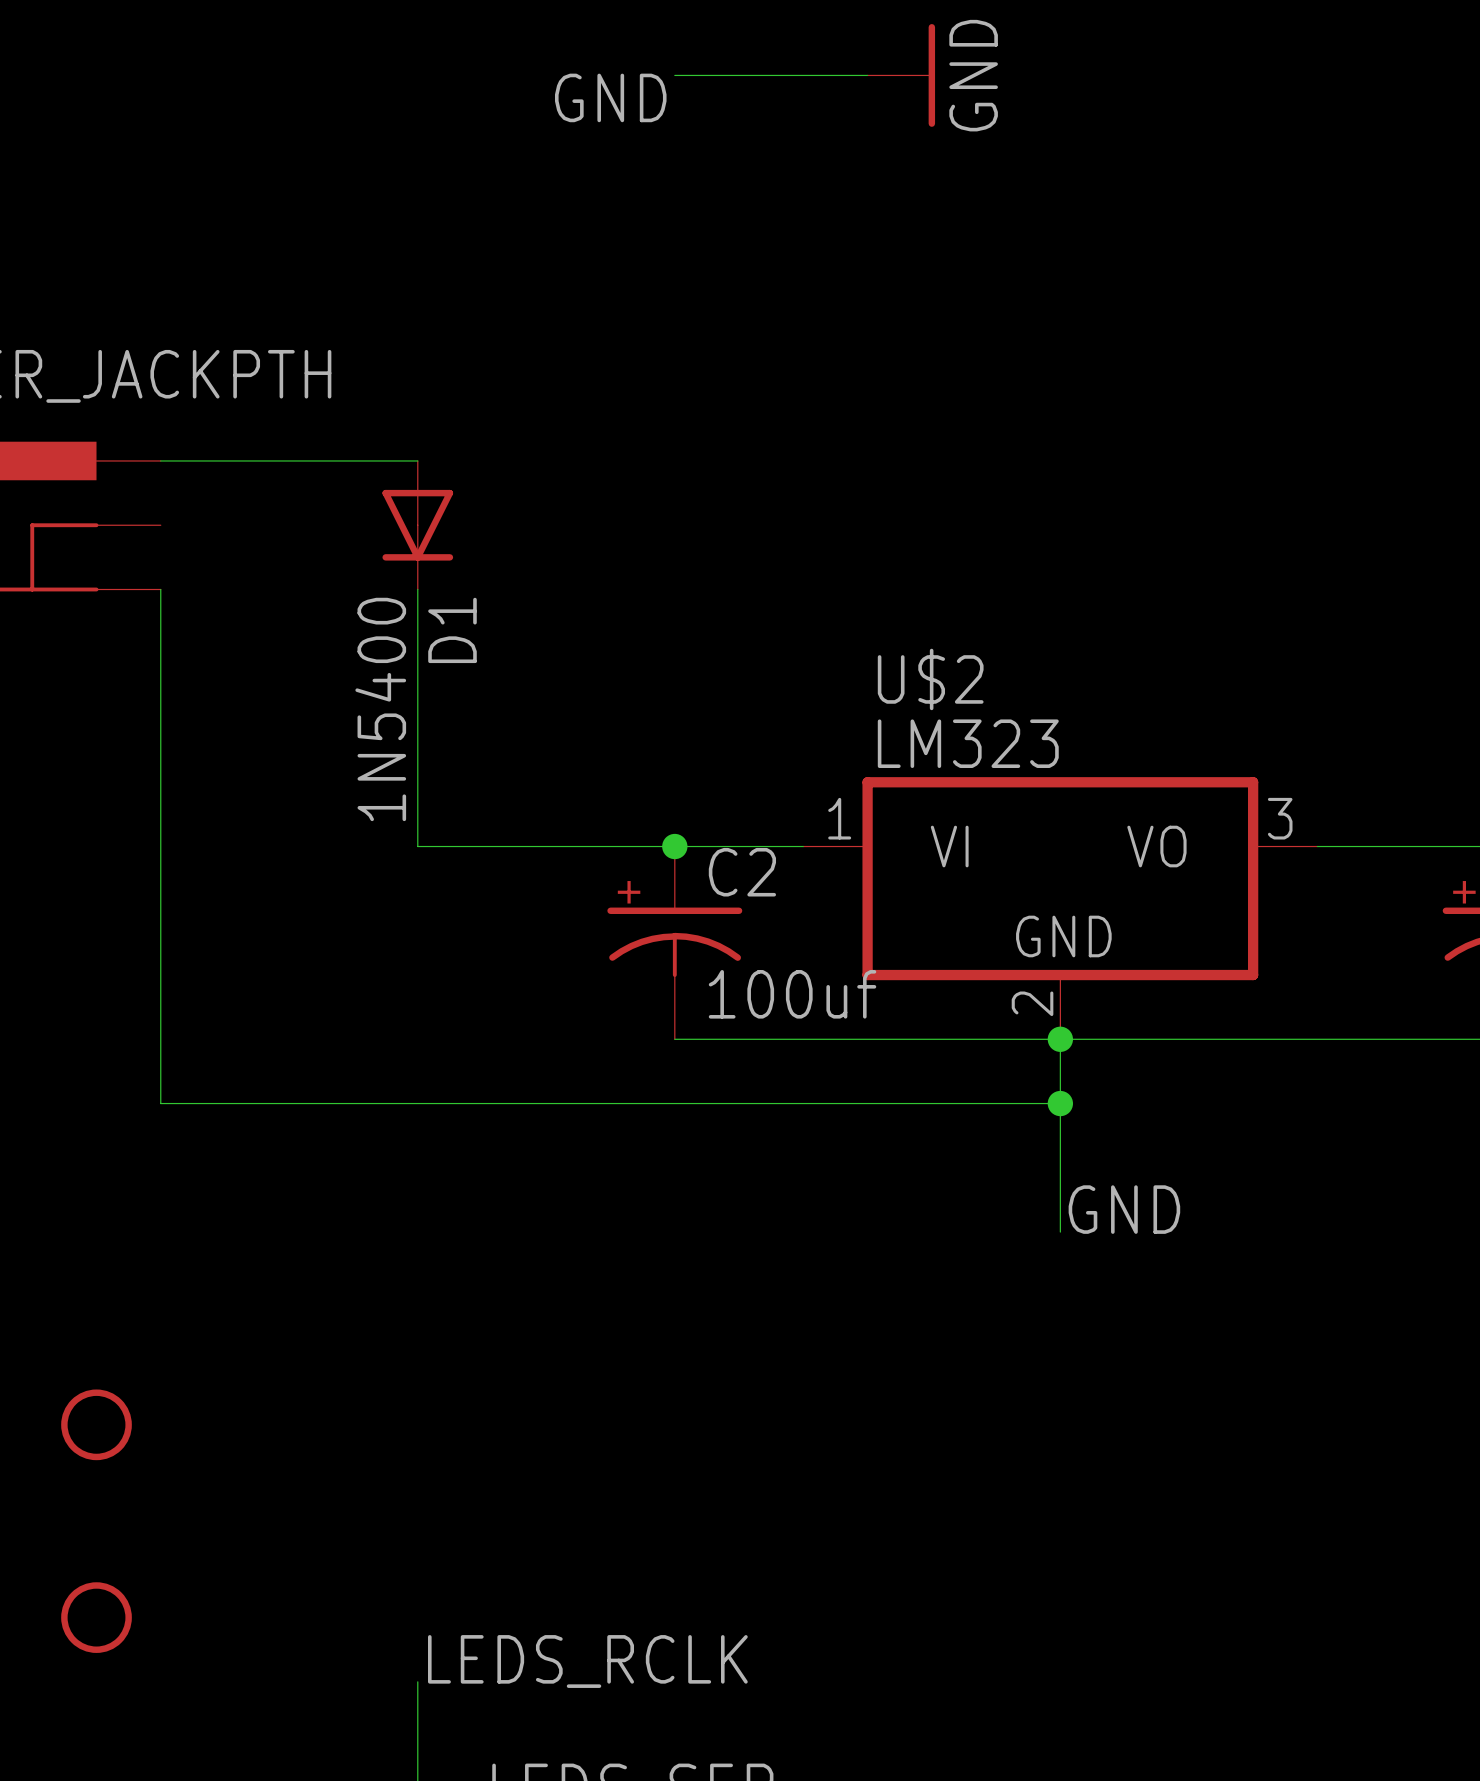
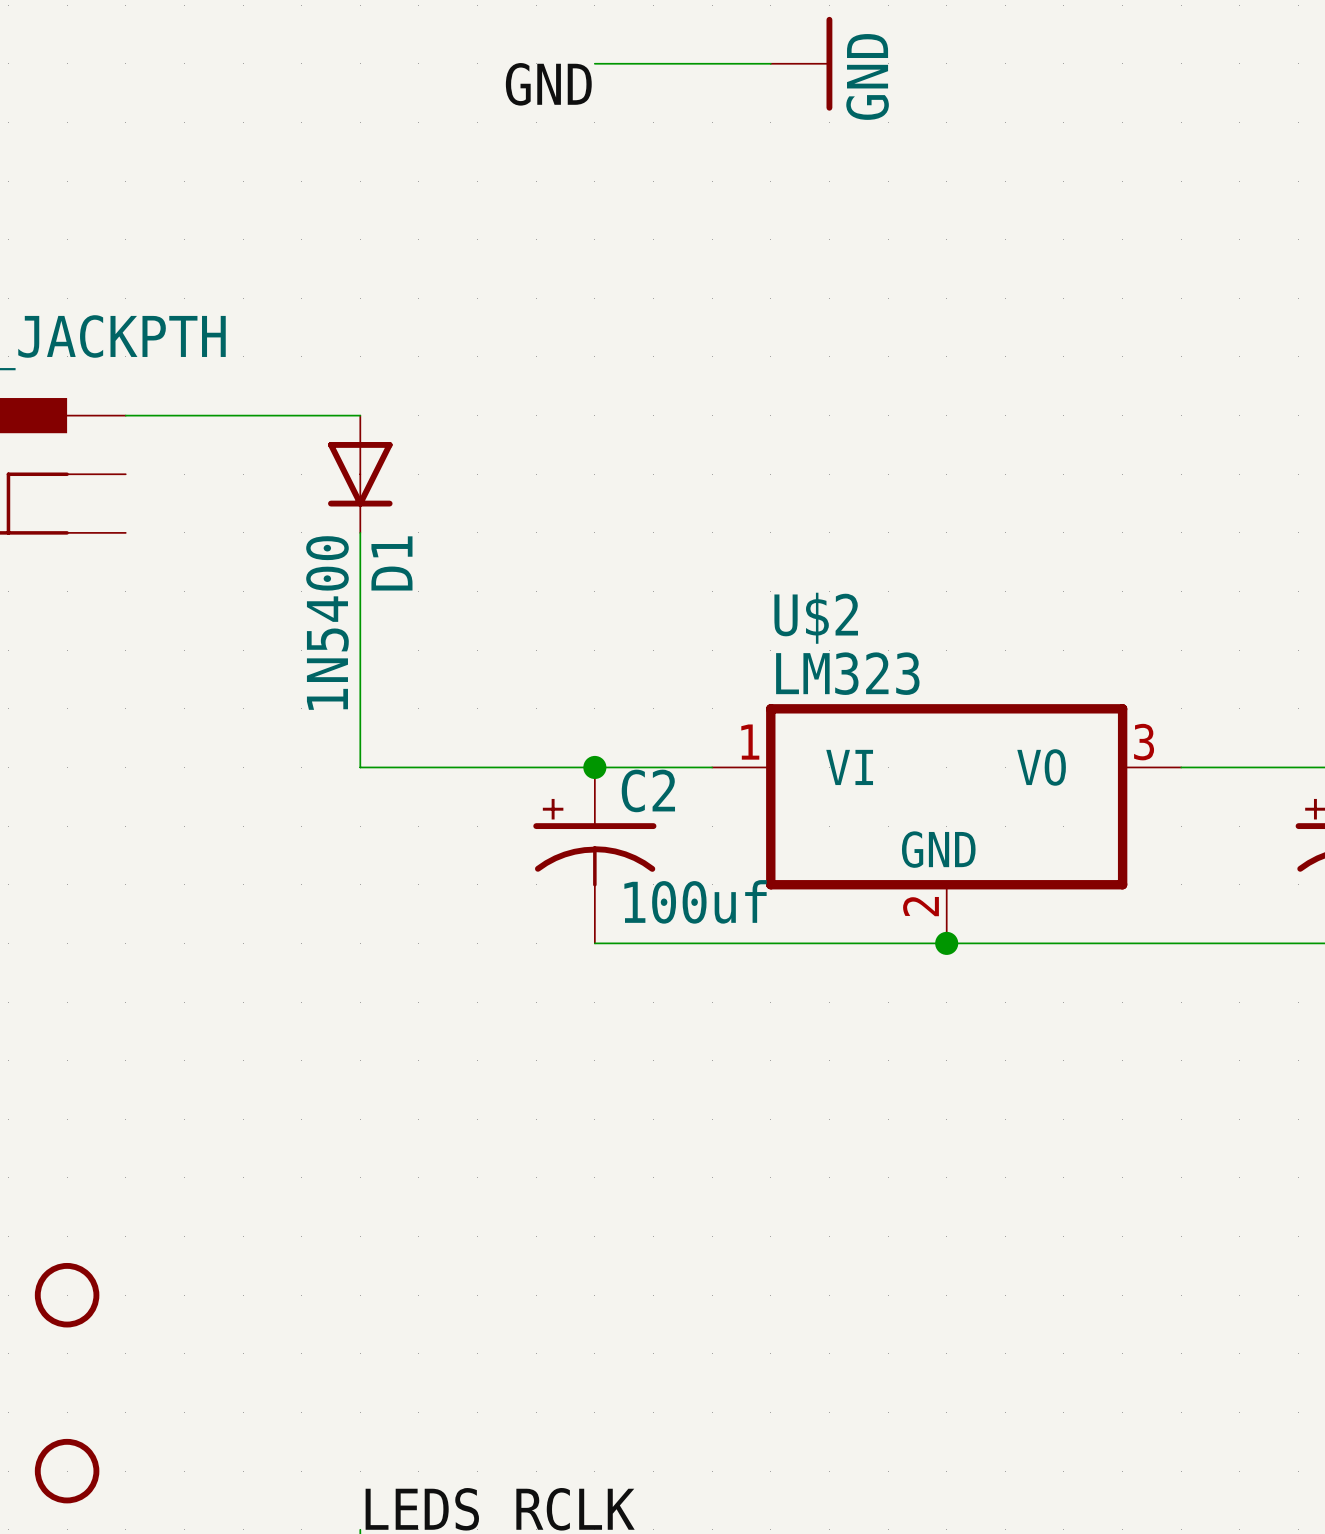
wire: (160, 589) (160, 1103) (1060, 1103) -> none
wire: (1060, 1039) (1060, 1232) -> none
junction: (1060, 1103) -> none
label: GND (1124, 1209) -> none

